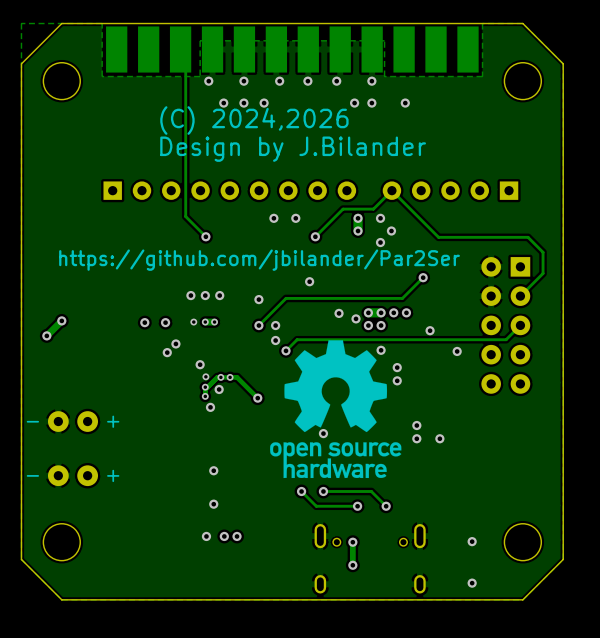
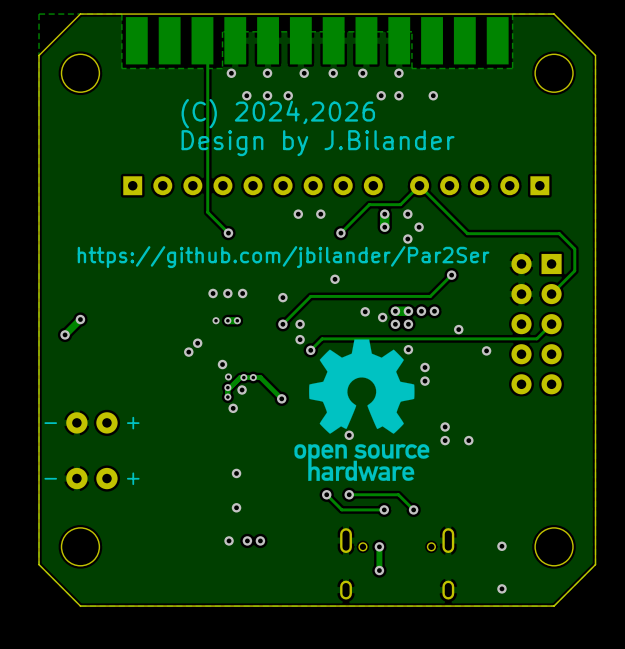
via: (144, 322) -> none
via: (165, 322) -> none

